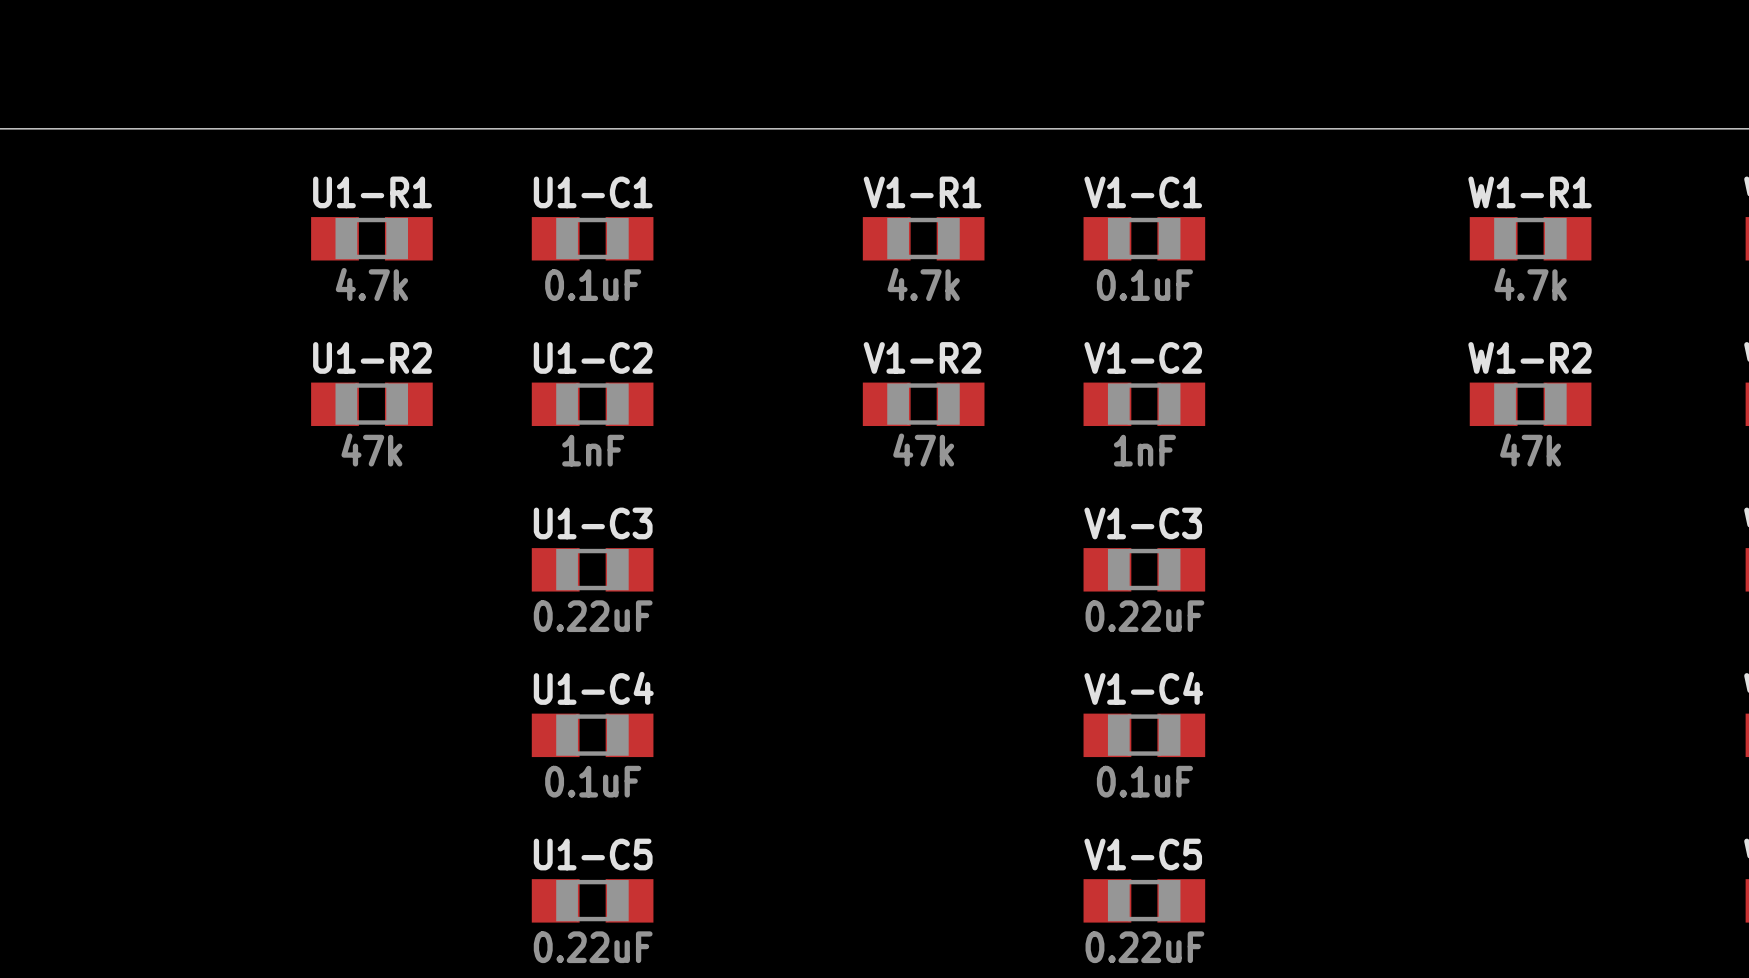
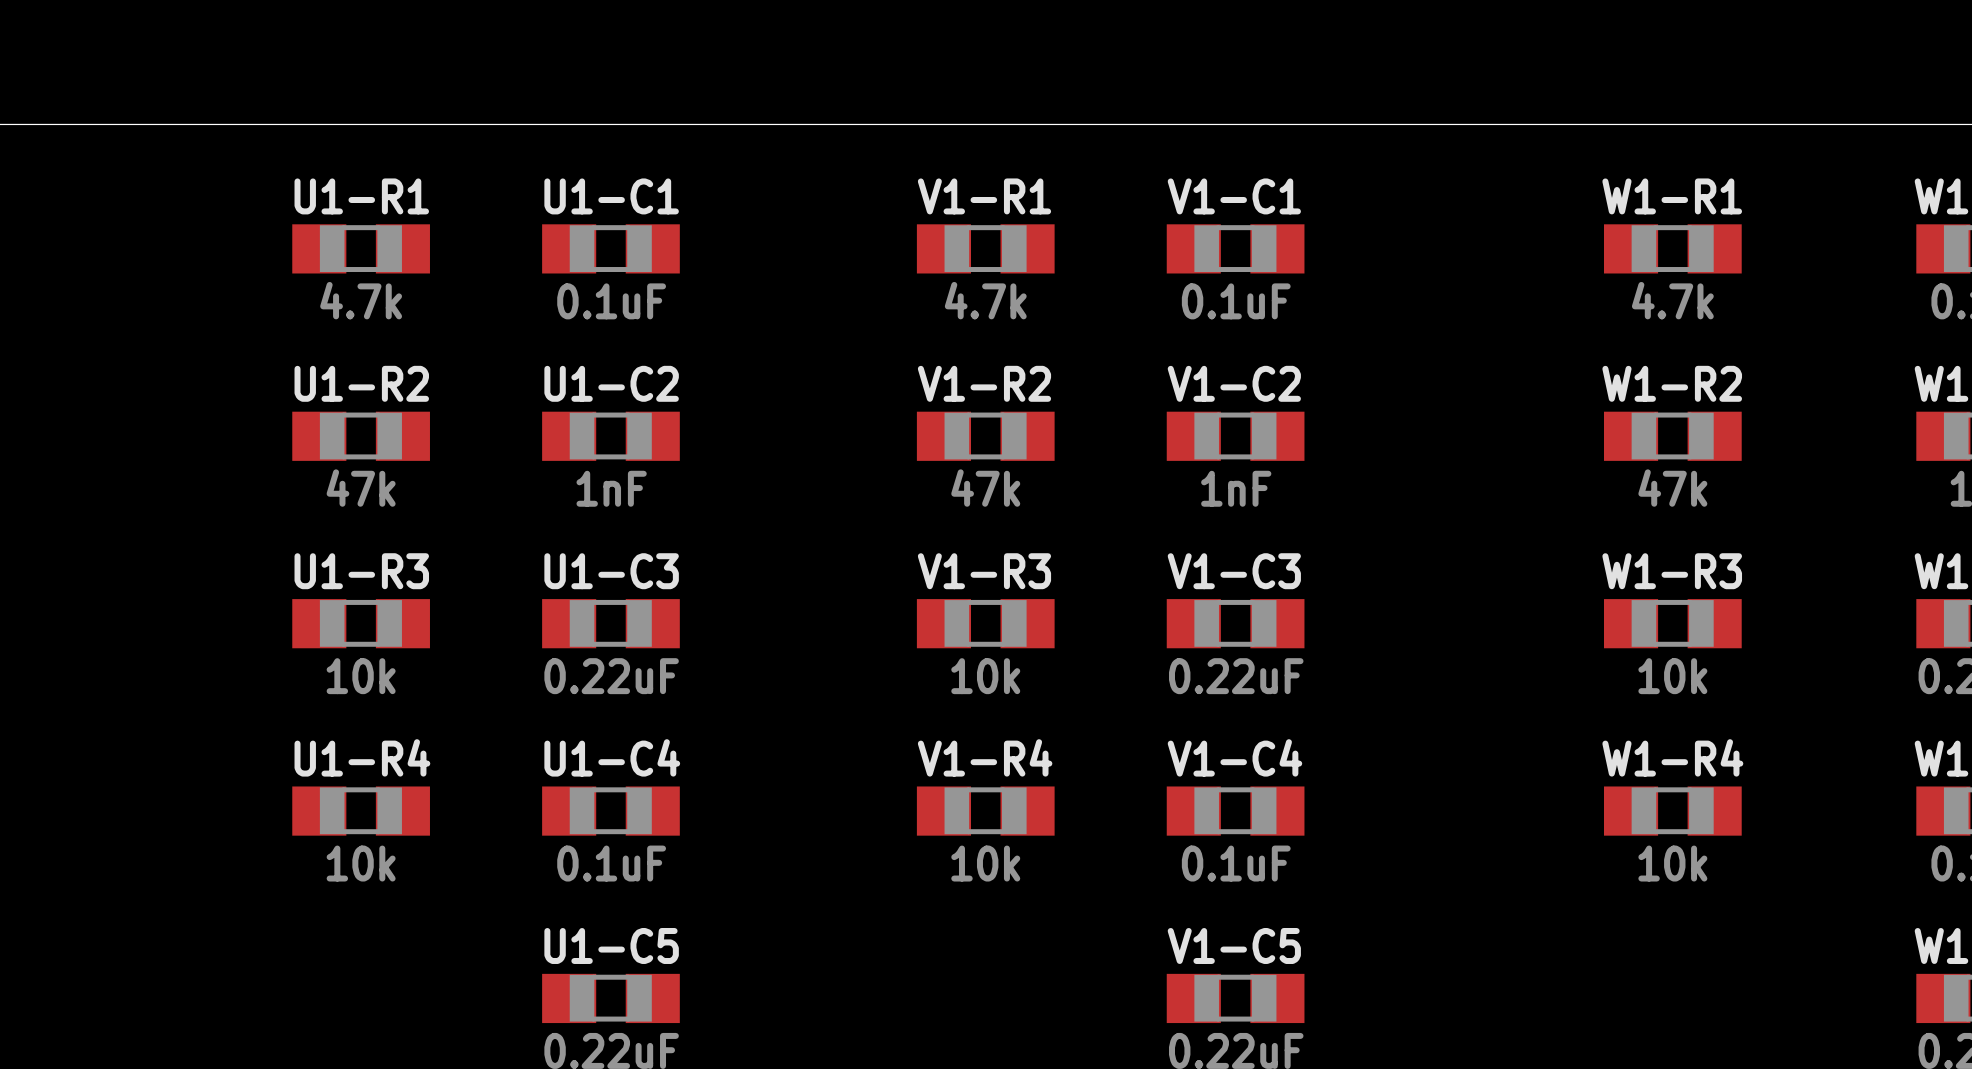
U1-R3: none -> 10k (361, 623)
V1-R3: none -> 10k (985, 623)
W1-R3: none -> 10k (1672, 623)
U1-R4: none -> 10k (361, 811)
V1-R4: none -> 10k (985, 811)
W1-R4: none -> 10k (1672, 811)

